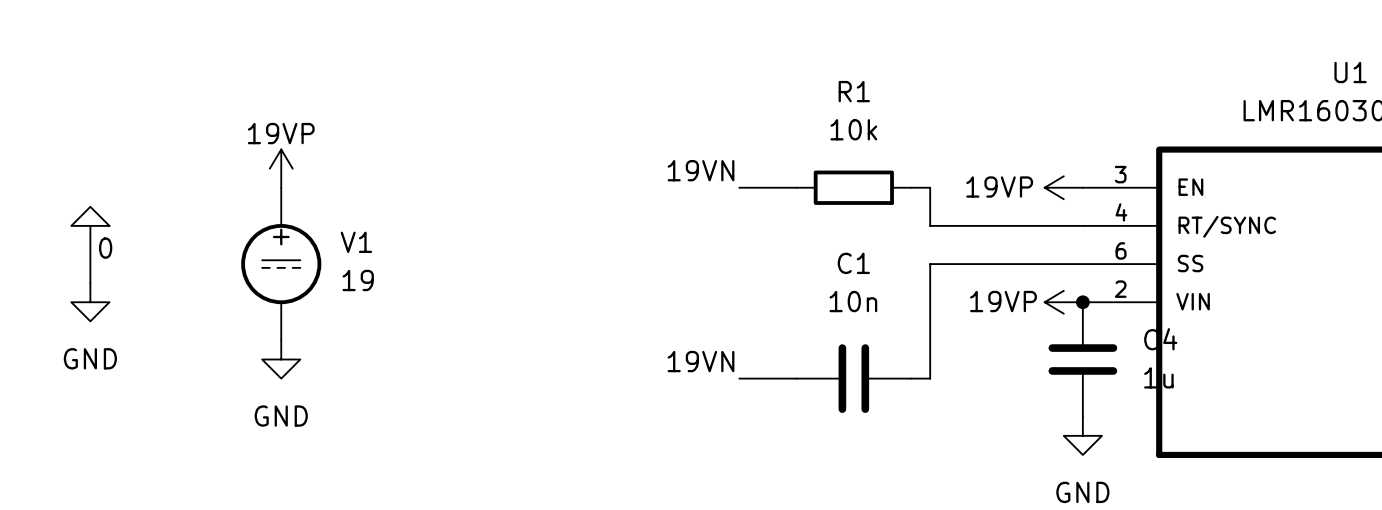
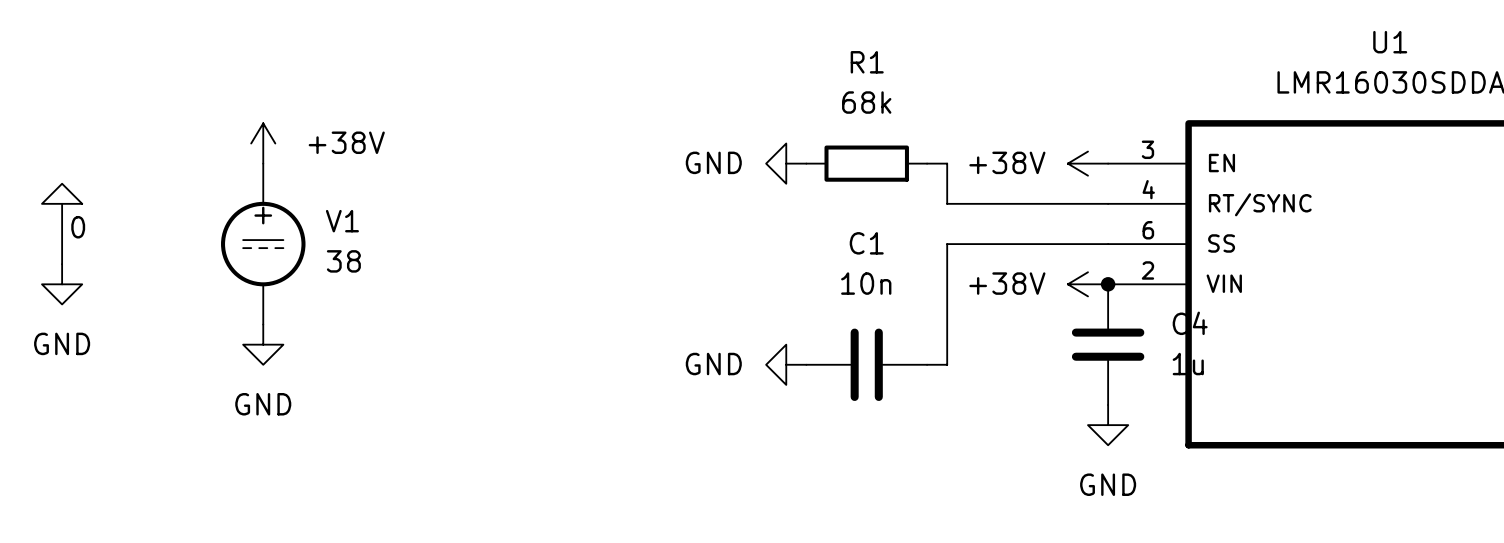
R1 value: 10k (853, 129) -> 68k (866, 102)
power symbol: 19VP (281, 168) -> +38V (263, 143)
label: 19VN (701, 170) -> none
wire: (739, 187) (796, 187) -> none
power symbol: none -> GND (786, 163)
power symbol: 19VP (1063, 187) -> +38V (1088, 163)
V1 value: 19 (358, 280) -> 38 (343, 261)
power symbol: 19VP (1063, 302) -> +38V (1088, 284)
label: 19VN (701, 361) -> none
wire: (739, 378) (796, 378) -> none
power symbol: none -> GND (786, 364)

